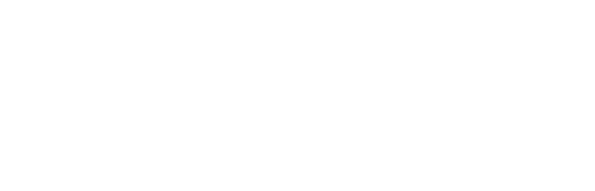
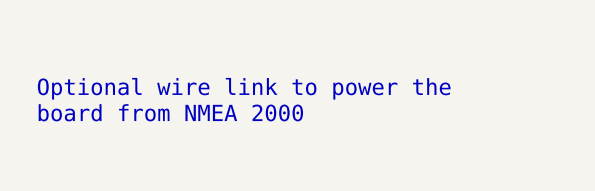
text: none -> Optional wire link to power the (244, 88)
text: none -> board from NMEA 2000 (170, 112)

